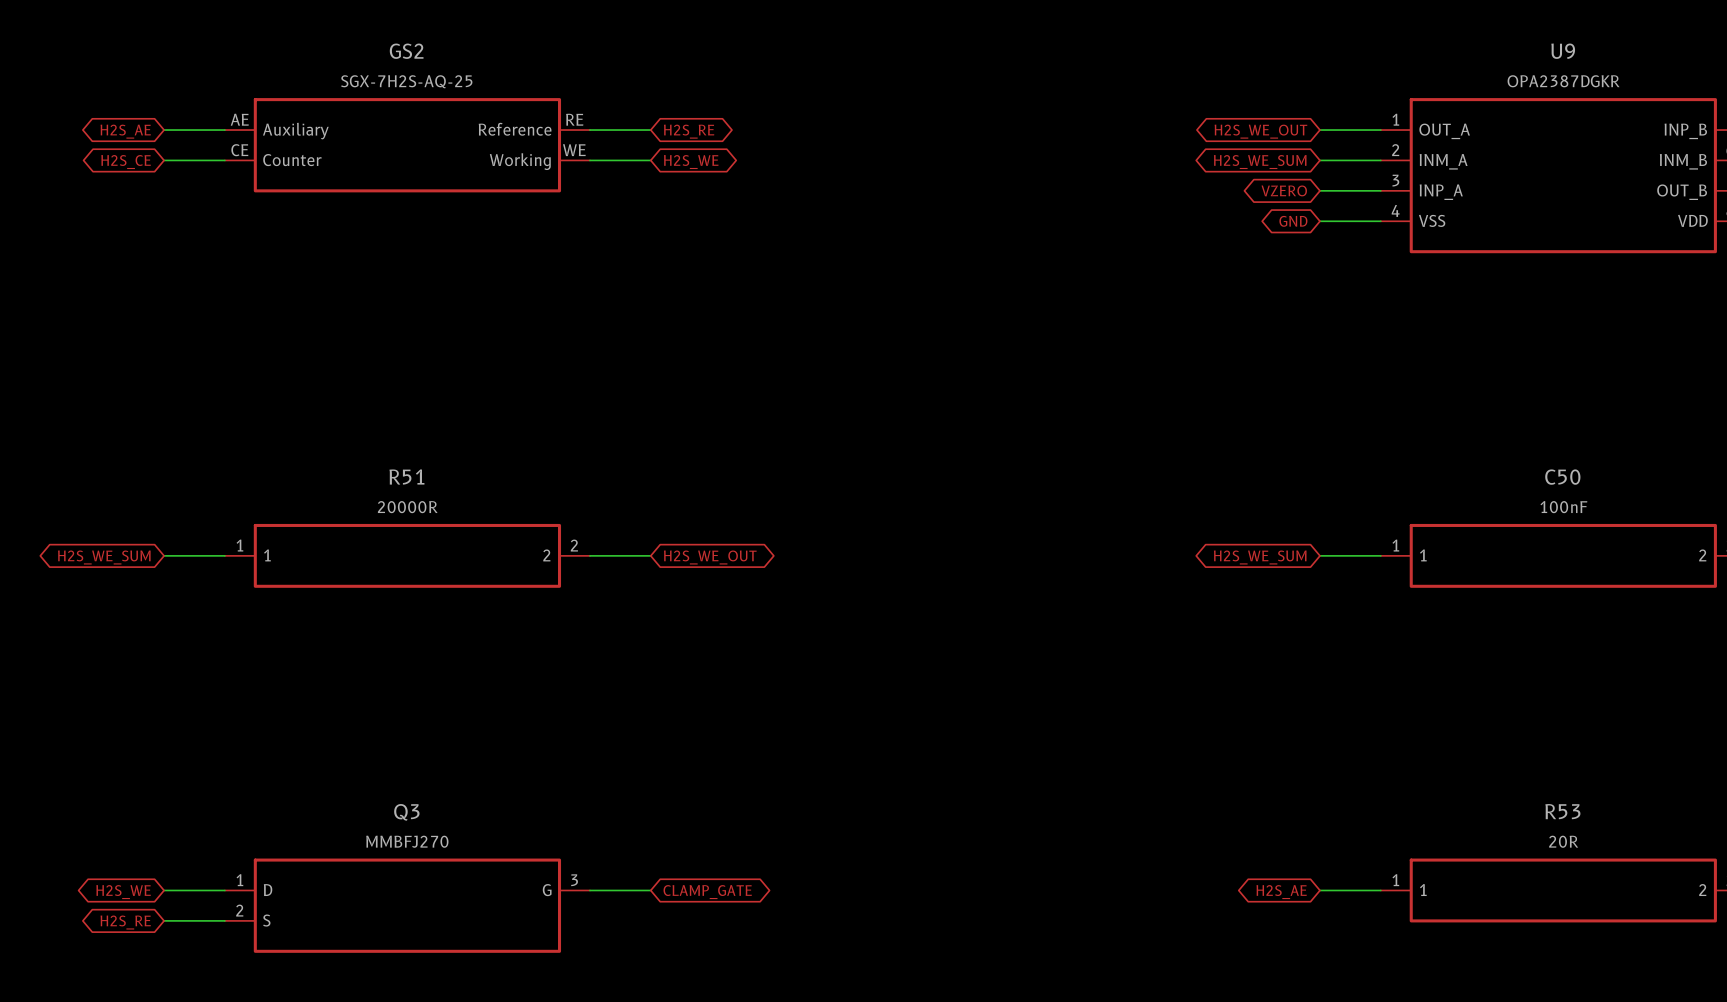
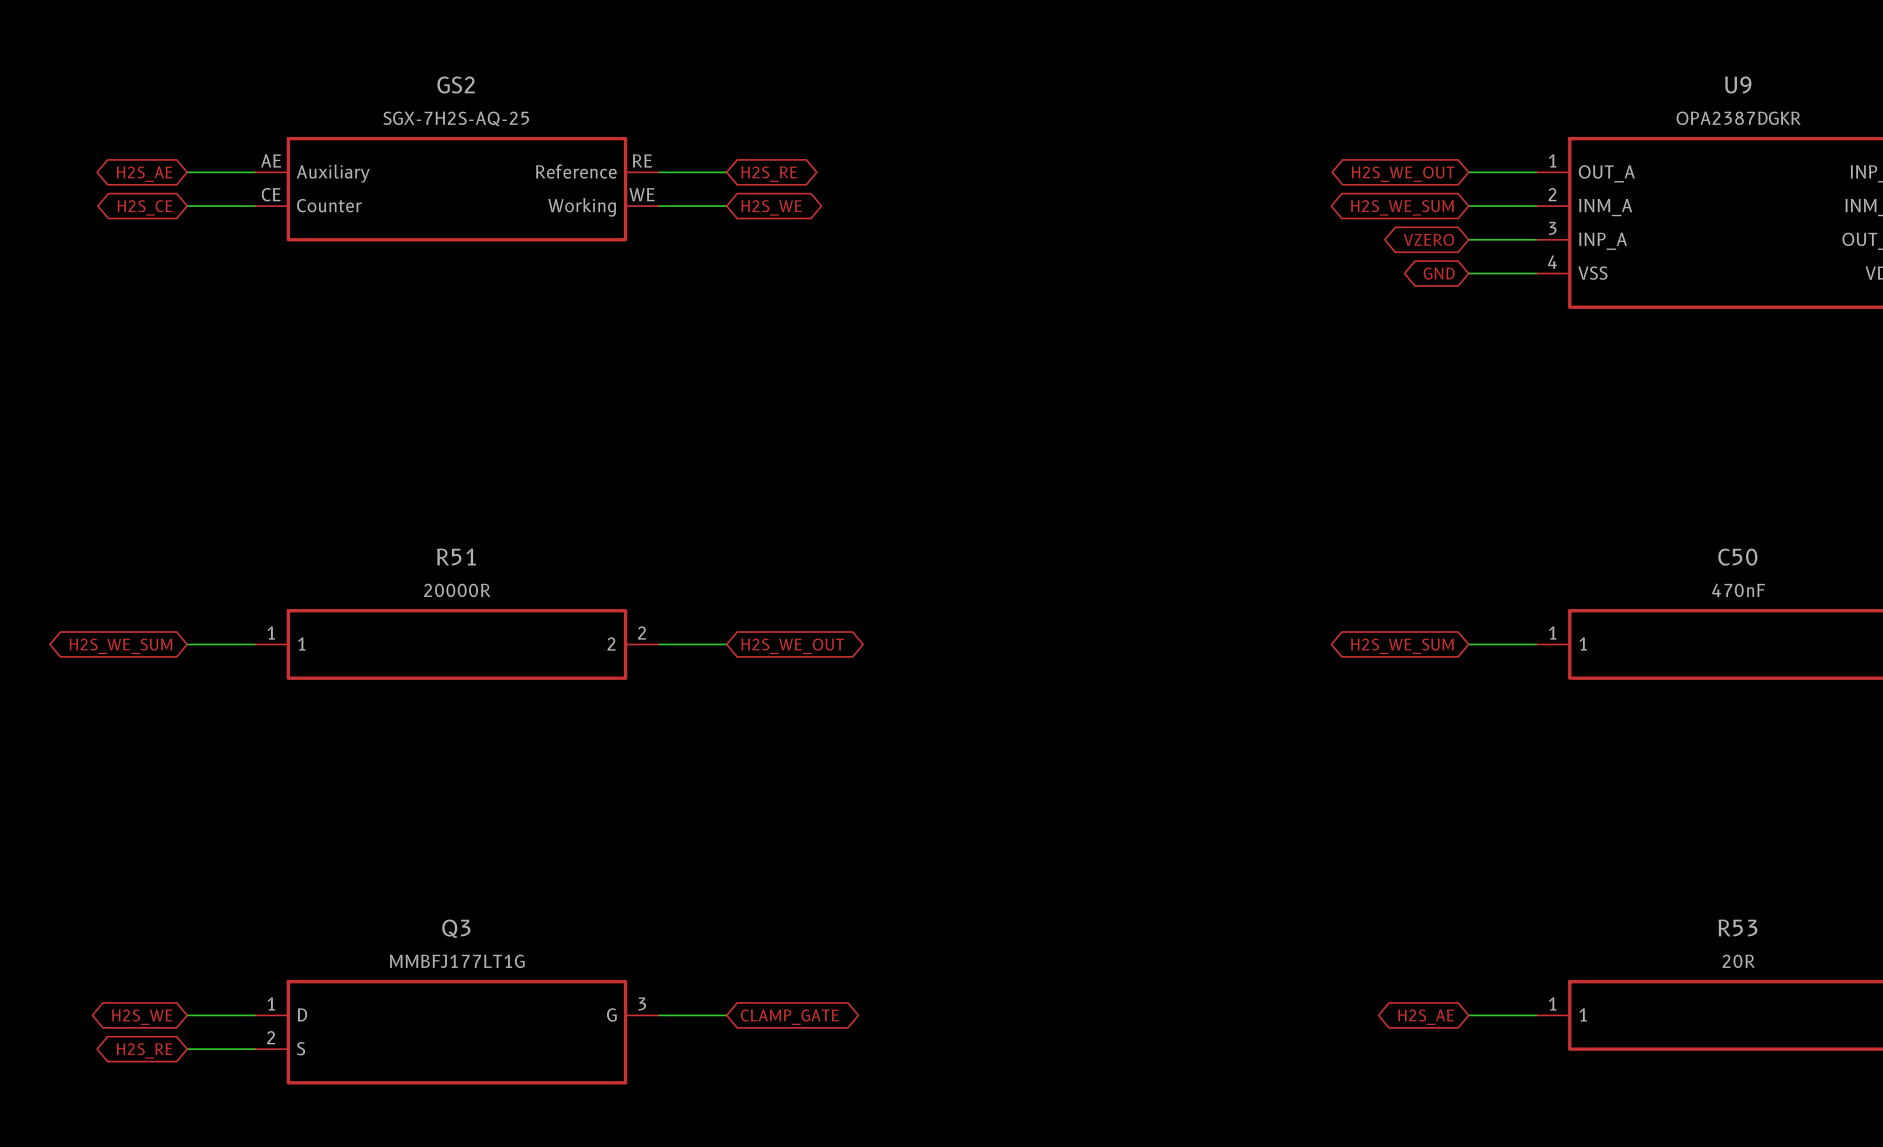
C50 value: 100nF (1563, 507) -> 470nF (1738, 590)
Q3 value: MMBFJ270 (407, 841) -> MMBFJ177LT1G (457, 961)

